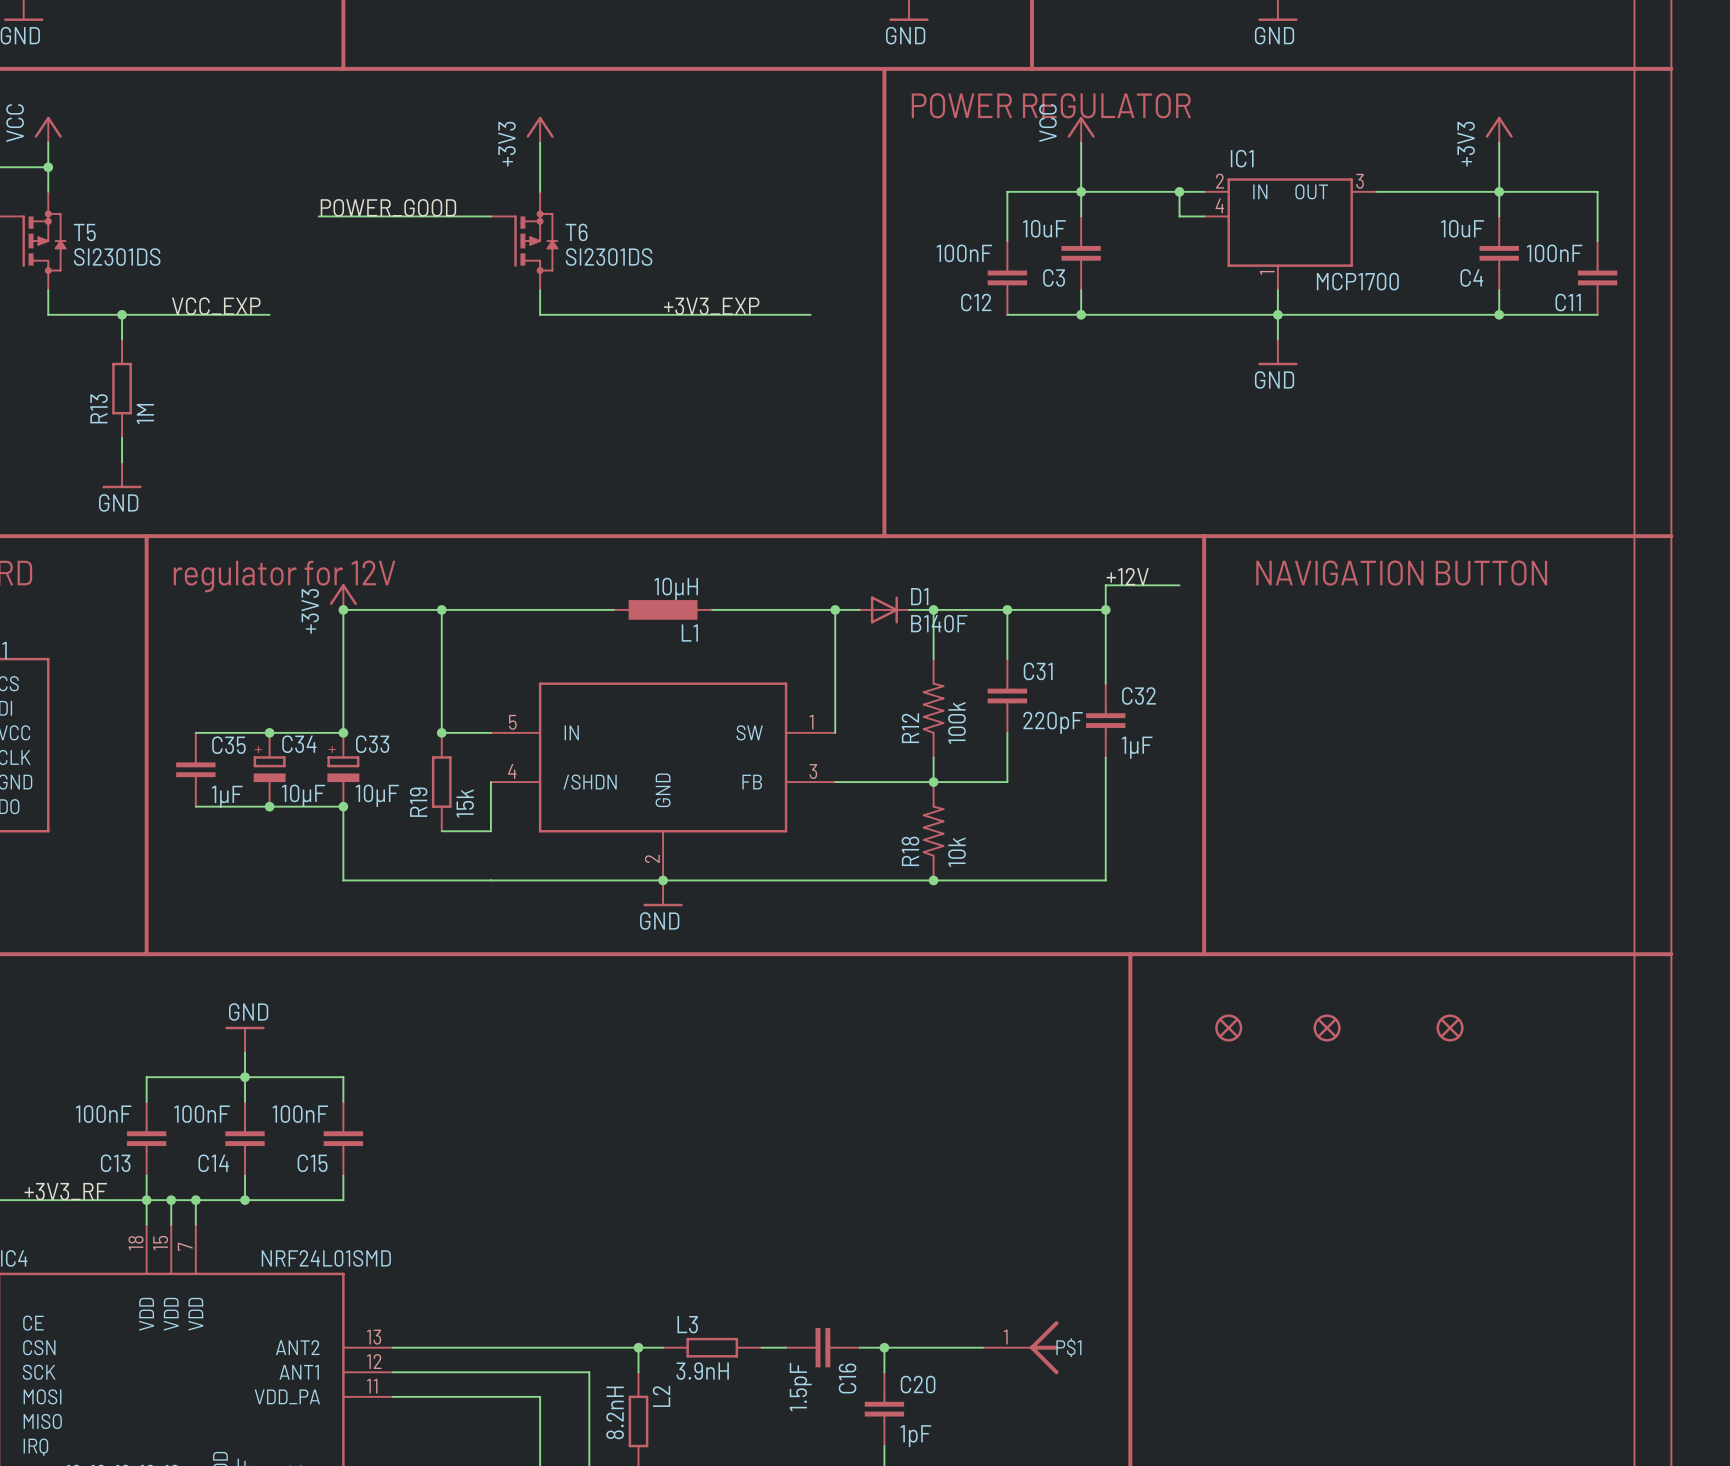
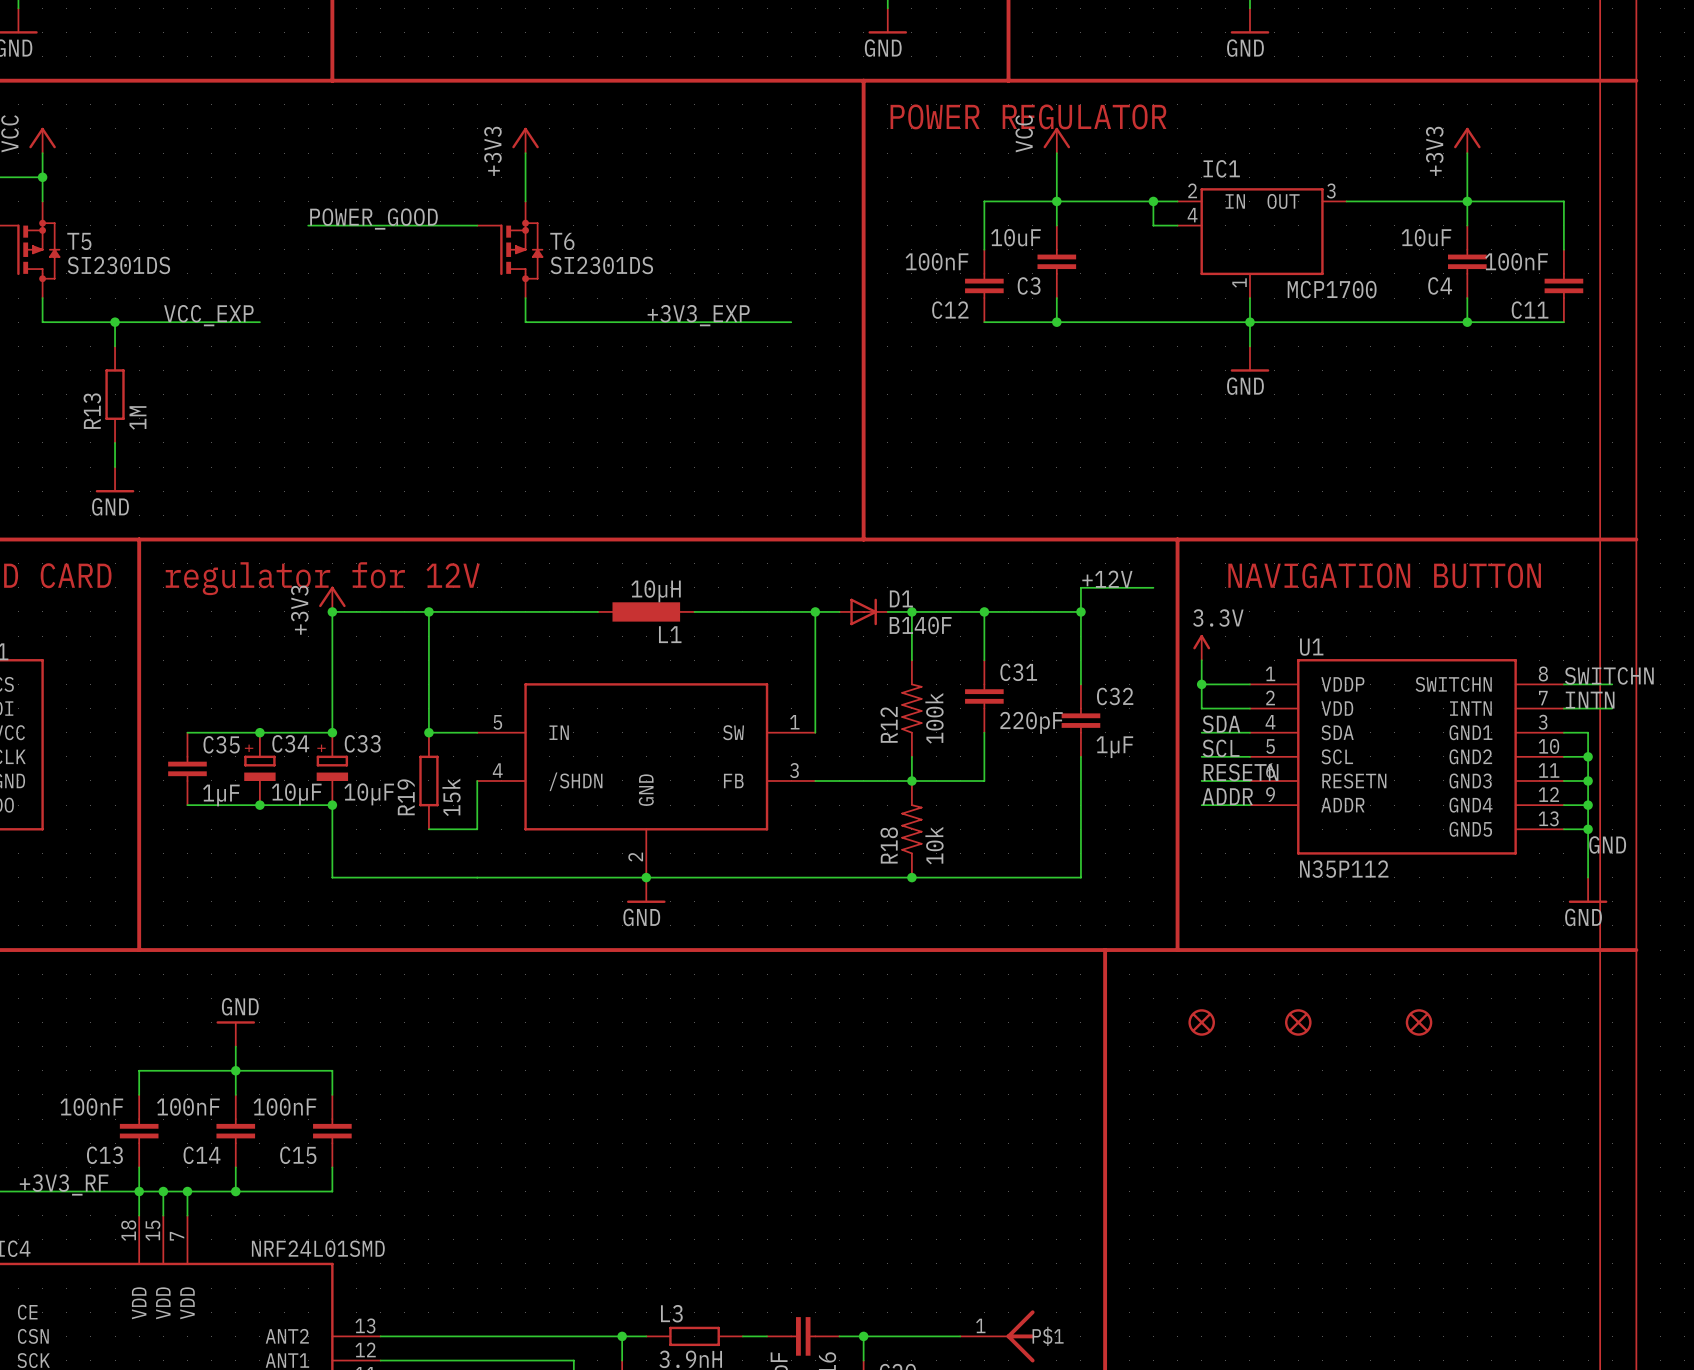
power symbol: none -> 3.3V (1201, 647)
wire: none -> (1201, 660) (1201, 708) (1249, 708)
label: none -> SWITCHN (1609, 675)
wire: none -> (1201, 684) (1249, 684)
junction: none -> (1201, 684)
wire: none -> (1563, 684) (1612, 684)
label: none -> INTN (1590, 700)
wire: none -> (1563, 708) (1612, 708)
label: none -> SDA (1221, 724)
wire: none -> (1201, 732) (1249, 732)
wire: none -> (1563, 732) (1588, 732) (1588, 877)
label: none -> SCL (1221, 748)
wire: none -> (1201, 756) (1249, 756)
U1: none -> N35P112 (1406, 756)
wire: none -> (1563, 756) (1588, 756)
junction: none -> (1588, 756)
label: none -> RESETN (1241, 772)
wire: none -> (1201, 780) (1249, 780)
wire: none -> (1563, 780) (1588, 780)
junction: none -> (1588, 780)
label: none -> ADDR (1227, 796)
wire: none -> (1201, 805) (1249, 805)
wire: none -> (1563, 805) (1588, 805)
junction: none -> (1588, 805)
wire: none -> (1563, 829) (1588, 829)
junction: none -> (1588, 829)
label: none -> GND (1607, 844)
power symbol: none -> GND (1588, 890)

